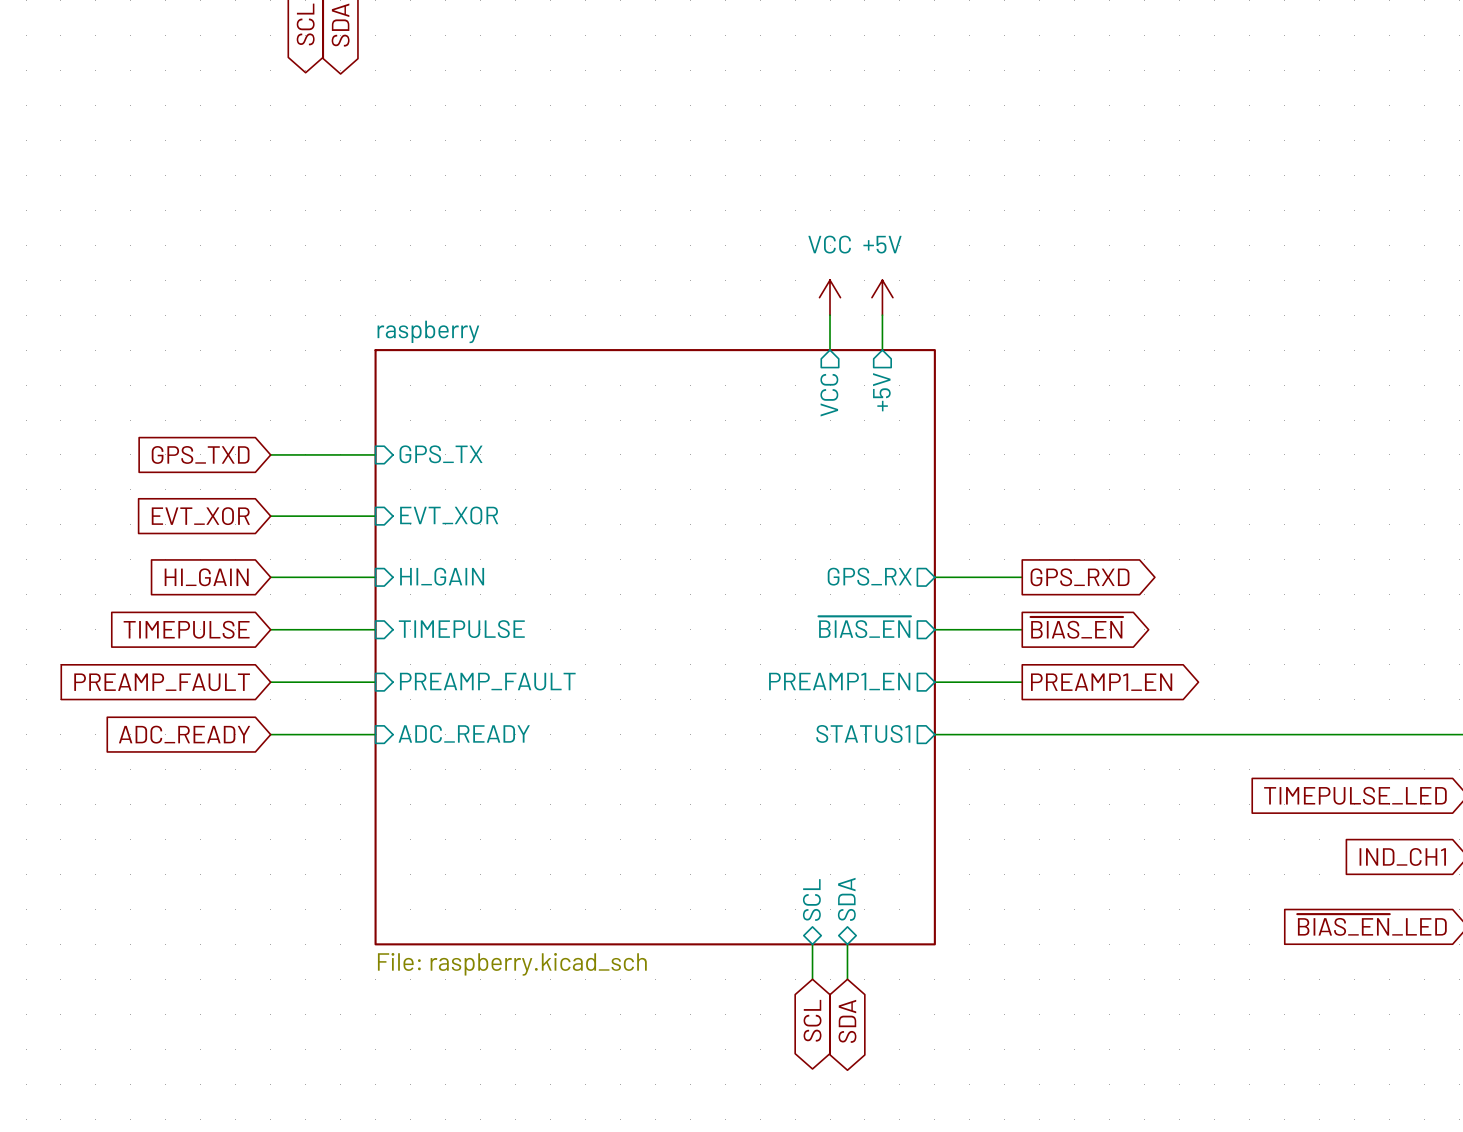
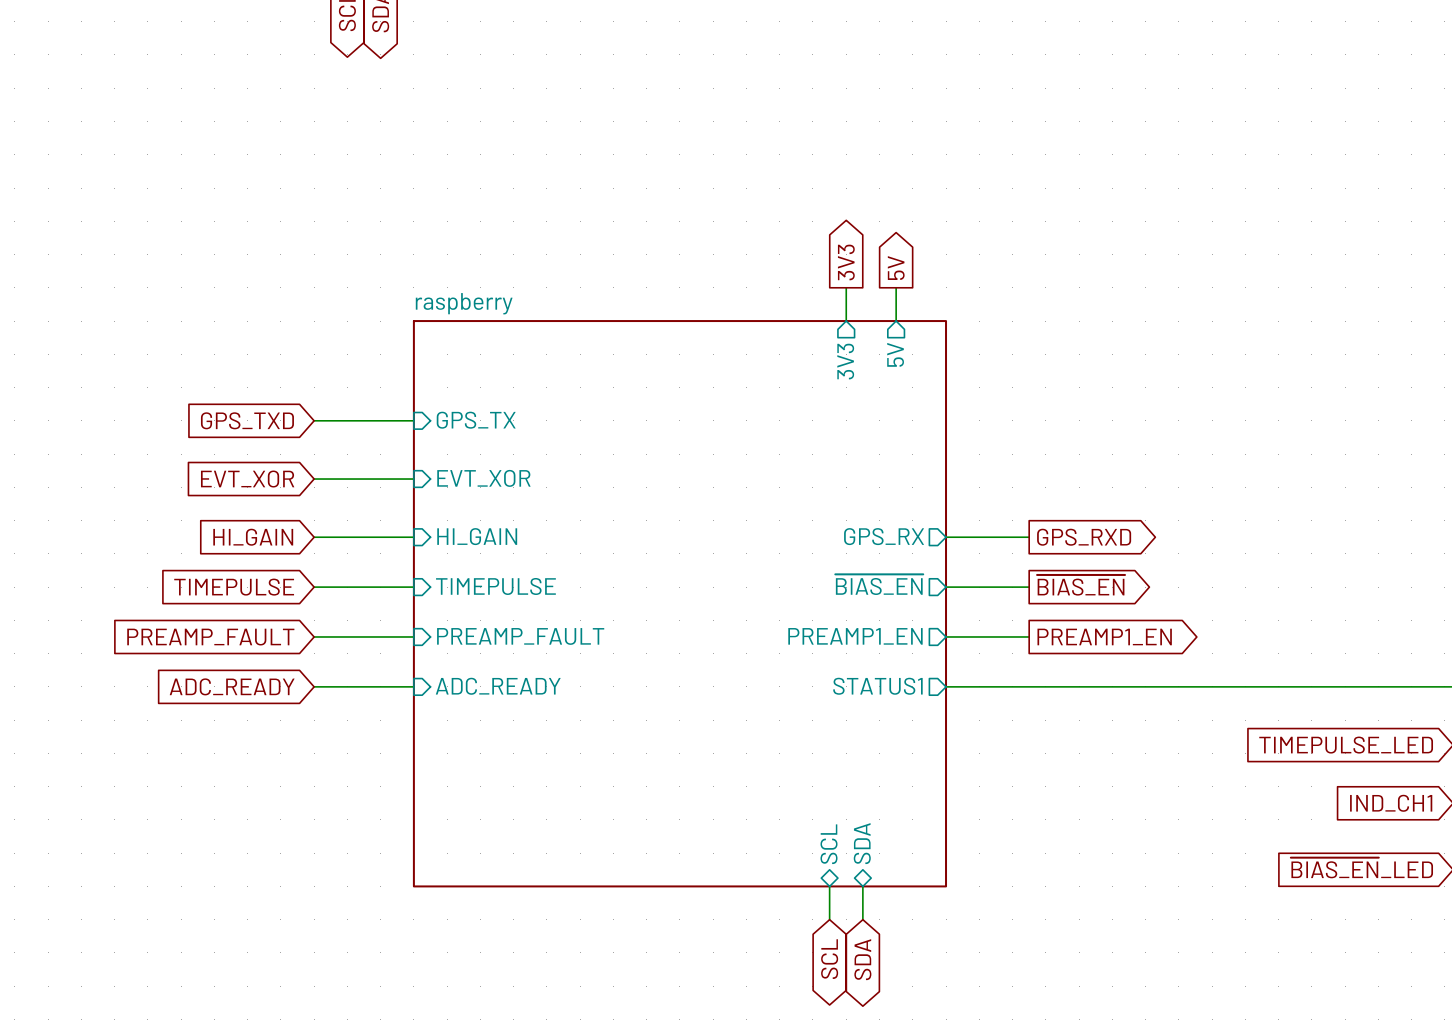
global label: none -> 3V3 (846, 262)
global label: none -> 5V (896, 268)
power symbol: VCC (830, 297) -> none
power symbol: +5V (882, 297) -> none
sheet pin: +5V (881, 392) -> 5V (895, 354)
sheet pin: VCC (829, 395) -> 3V3 (845, 361)
sheet raspberry value: File: raspberry.kicad_sch (512, 964) -> none

